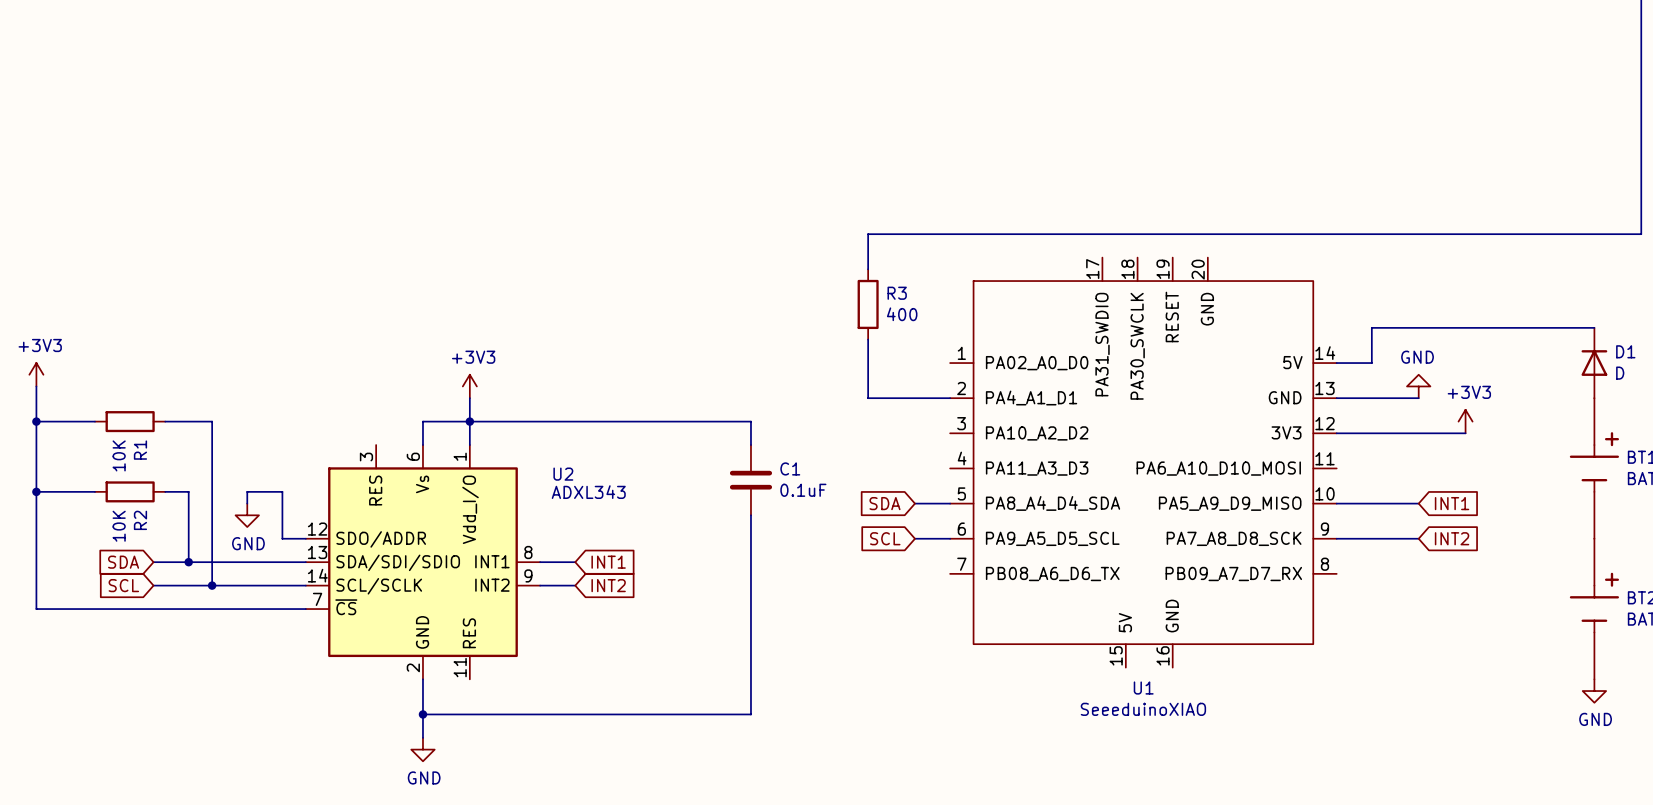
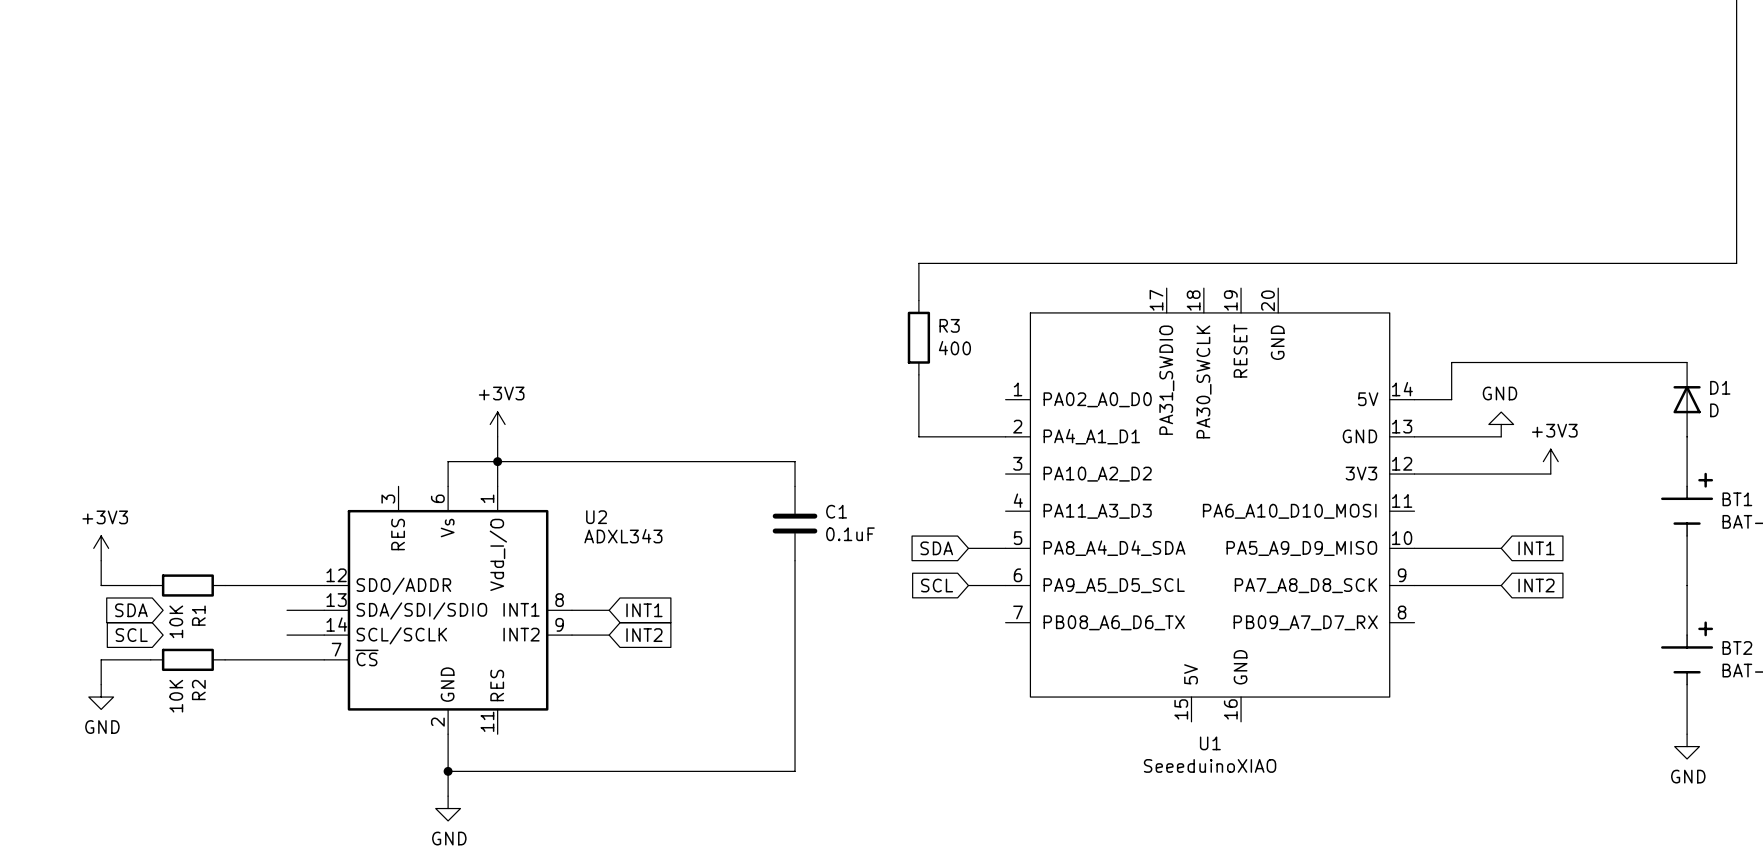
power symbol position: +3V3 (36, 374) -> +3V3 (101, 548)
wire: (36, 386) (36, 609) (94, 609) -> (101, 684) (101, 659)
wire: (36, 421) (94, 421) -> none
junction: (36, 421) -> none
R1 position: (130, 421) -> (187, 585)
wire: (165, 421) (212, 421) (212, 585) -> none
wire: (36, 491) (94, 491) -> none
junction: (36, 491) -> none
R2 position: (130, 491) -> (187, 659)
wire: (165, 491) (188, 491) (188, 562) -> none
wire: (247, 503) (247, 491) (282, 491) (282, 538) -> (225, 585) (299, 585)
wire: none -> (101, 560) (101, 585) (150, 585)
power symbol position: GND (247, 515) -> GND (101, 697)
wire: (153, 562) (270, 562) -> none
junction: (188, 562) -> none
wire: (153, 585) (270, 585) -> none
junction: (212, 585) -> none
wire: (141, 609) (212, 609) -> none

